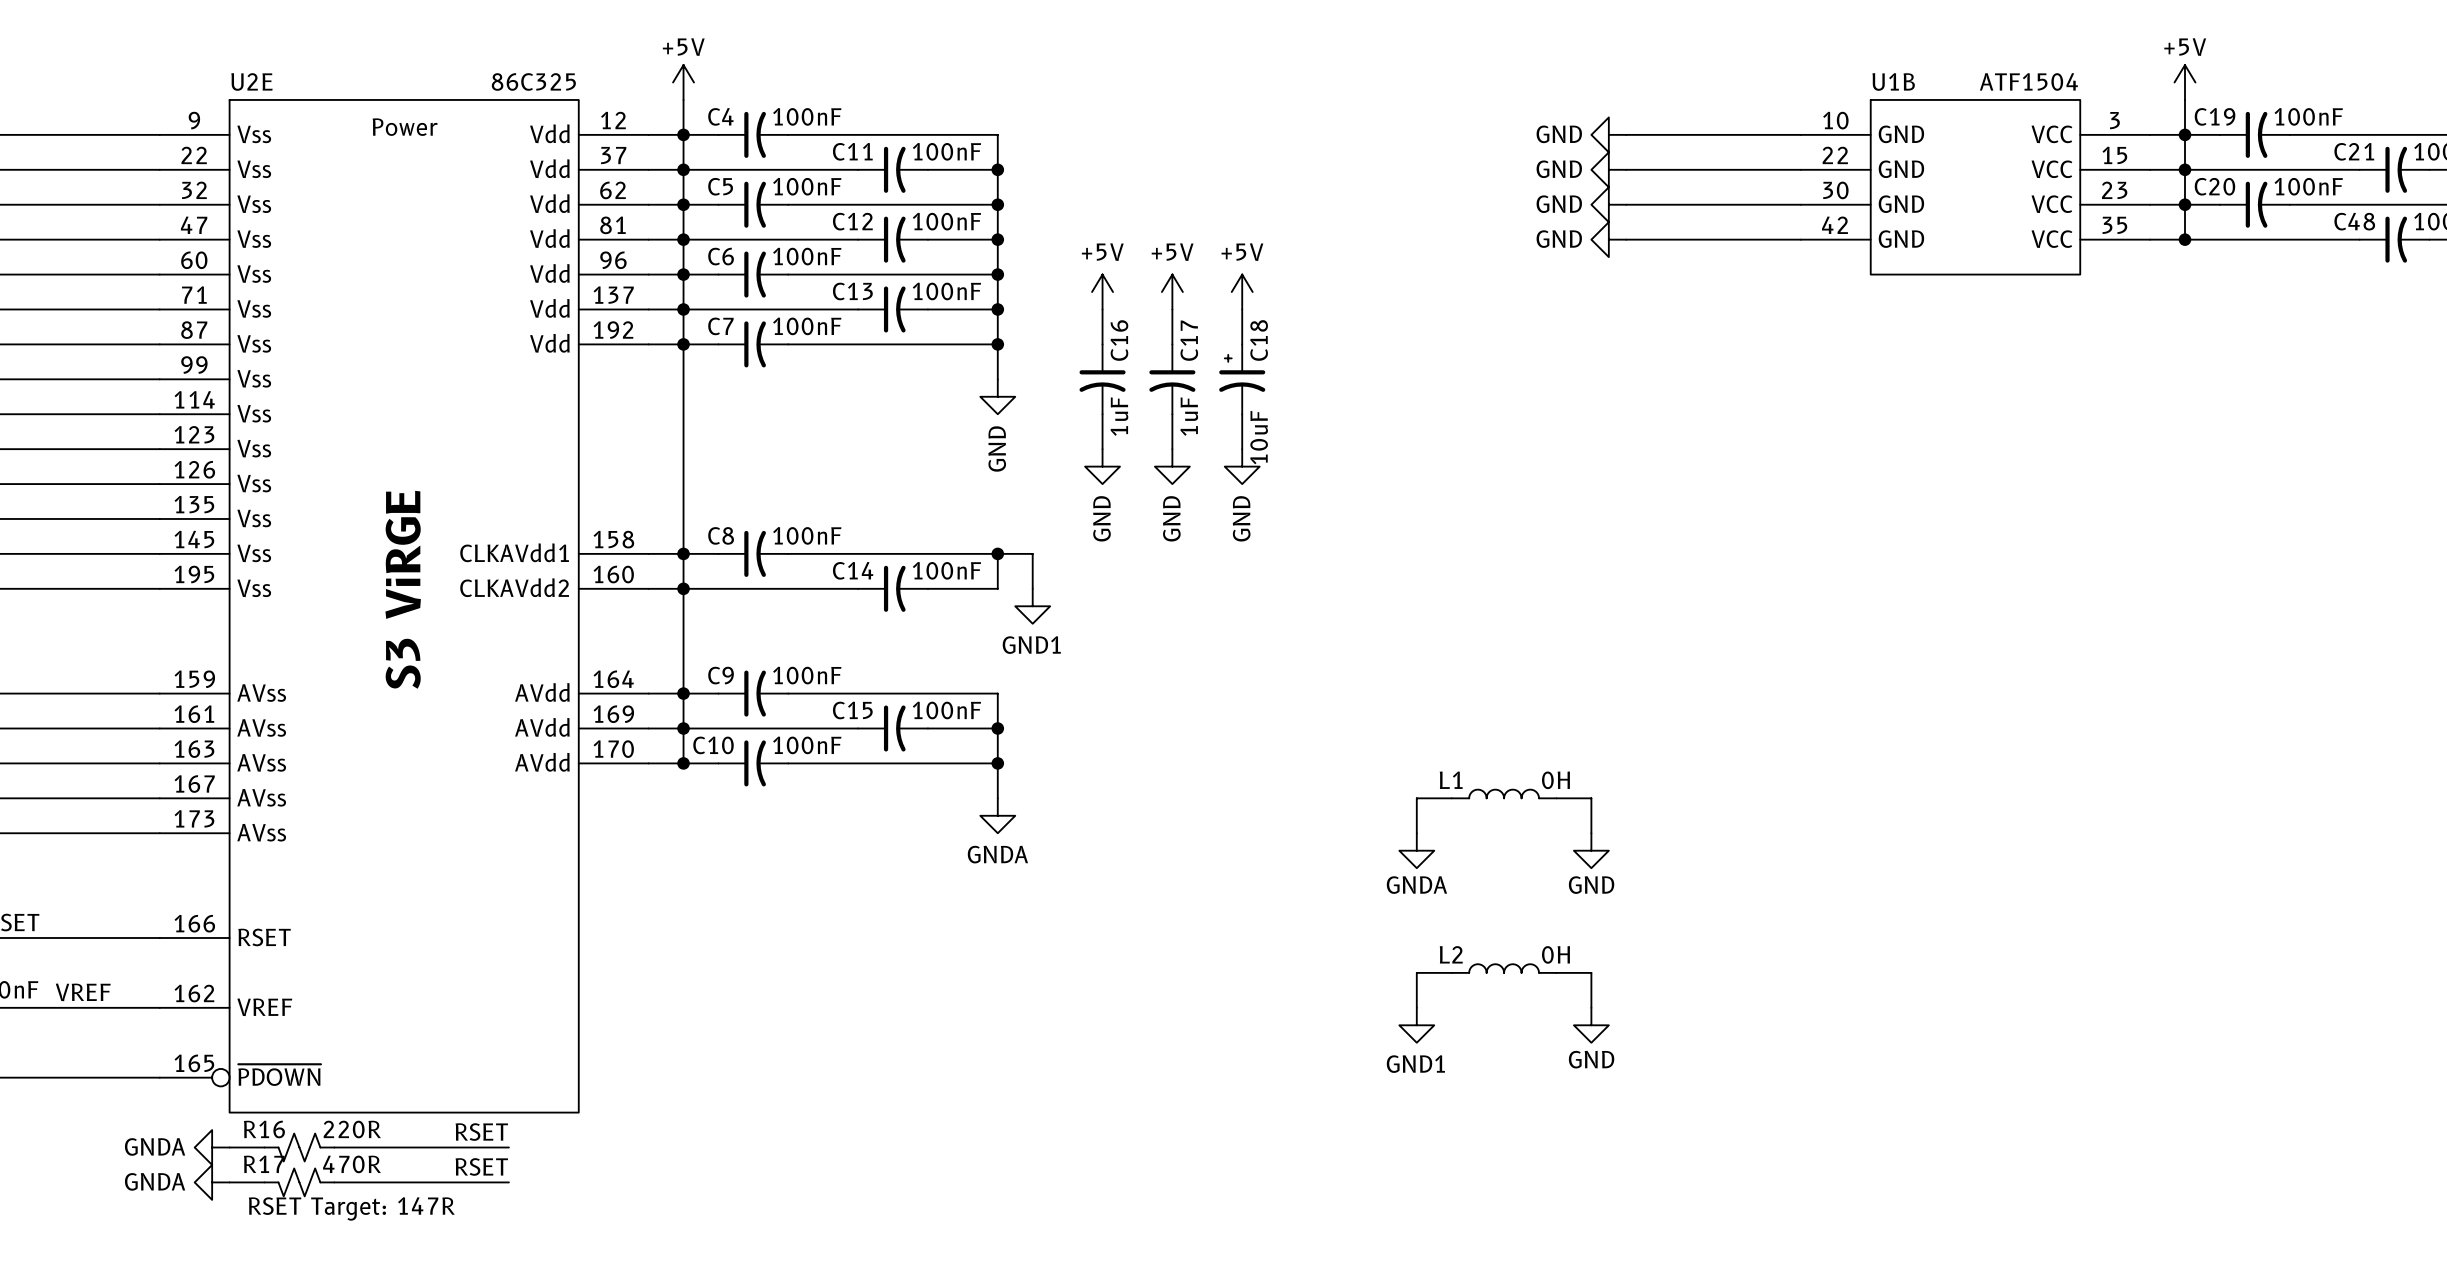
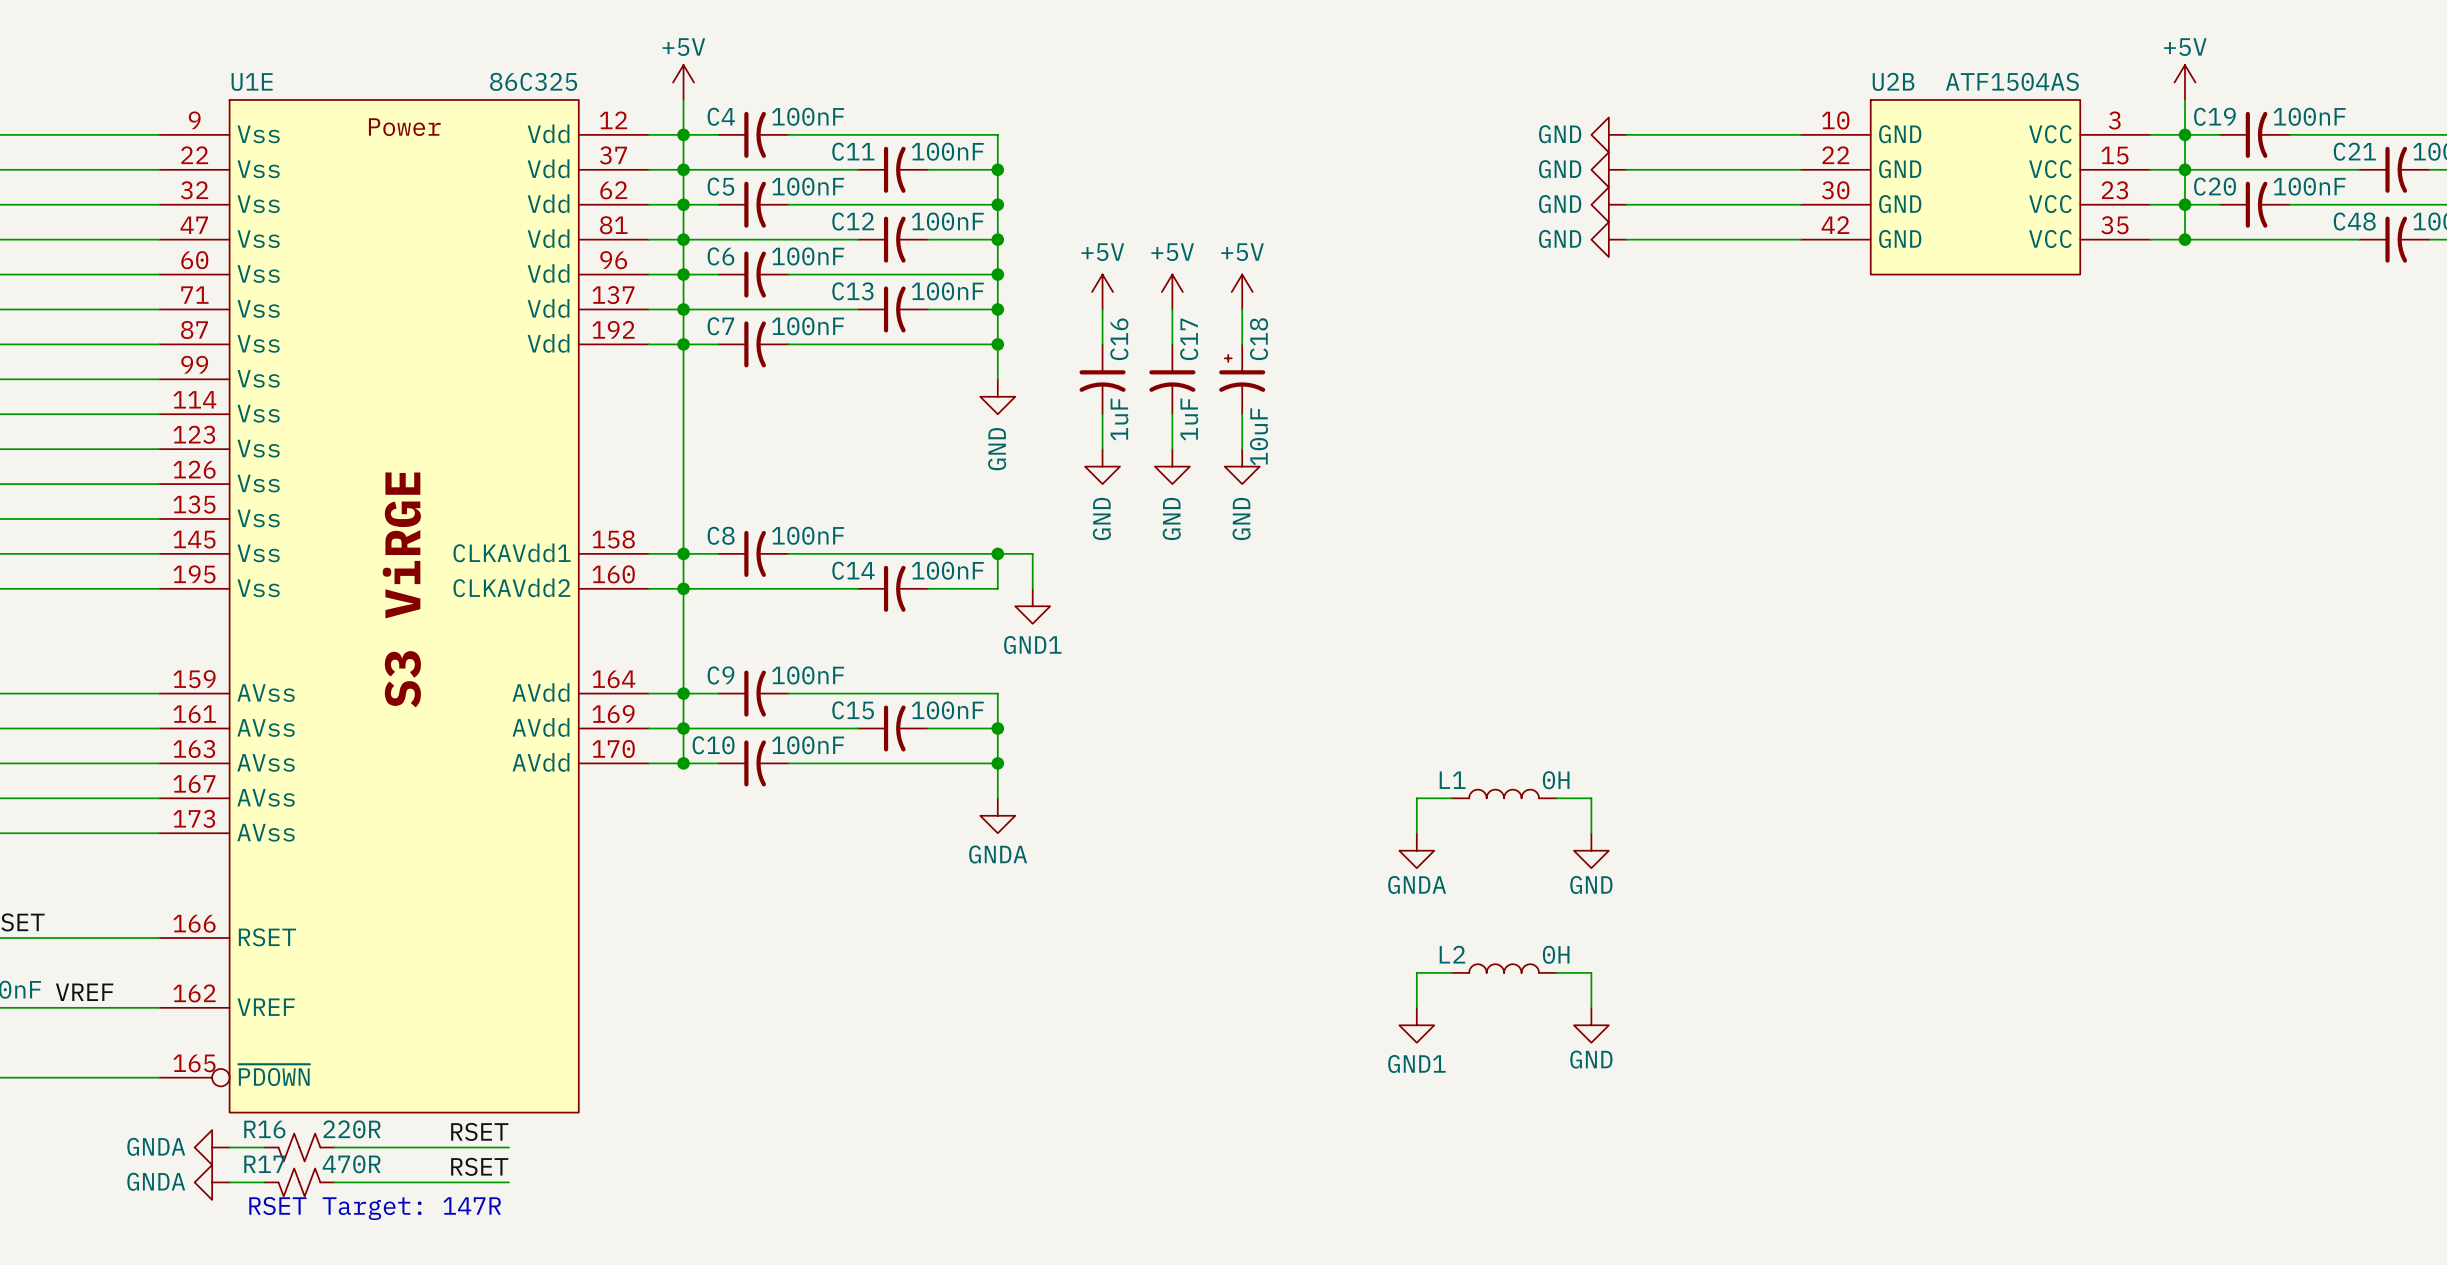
U2E name: U2E (251, 81) -> U1E (252, 82)
U1B name: U1B (1893, 81) -> U2B (1893, 81)
U1B value: ATF1504 (2028, 81) -> ATF1504AS (2012, 81)

